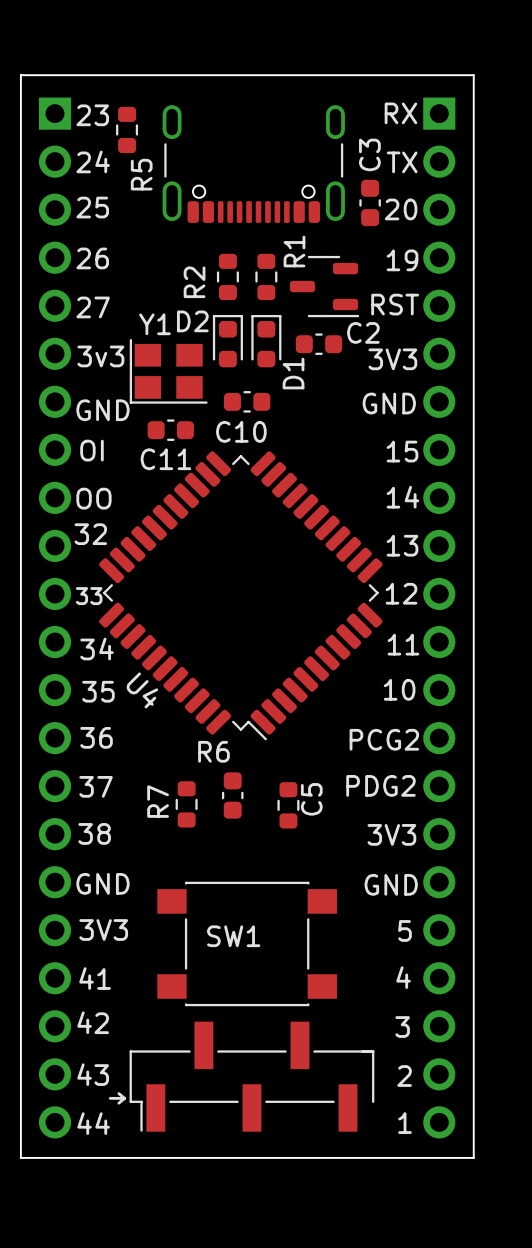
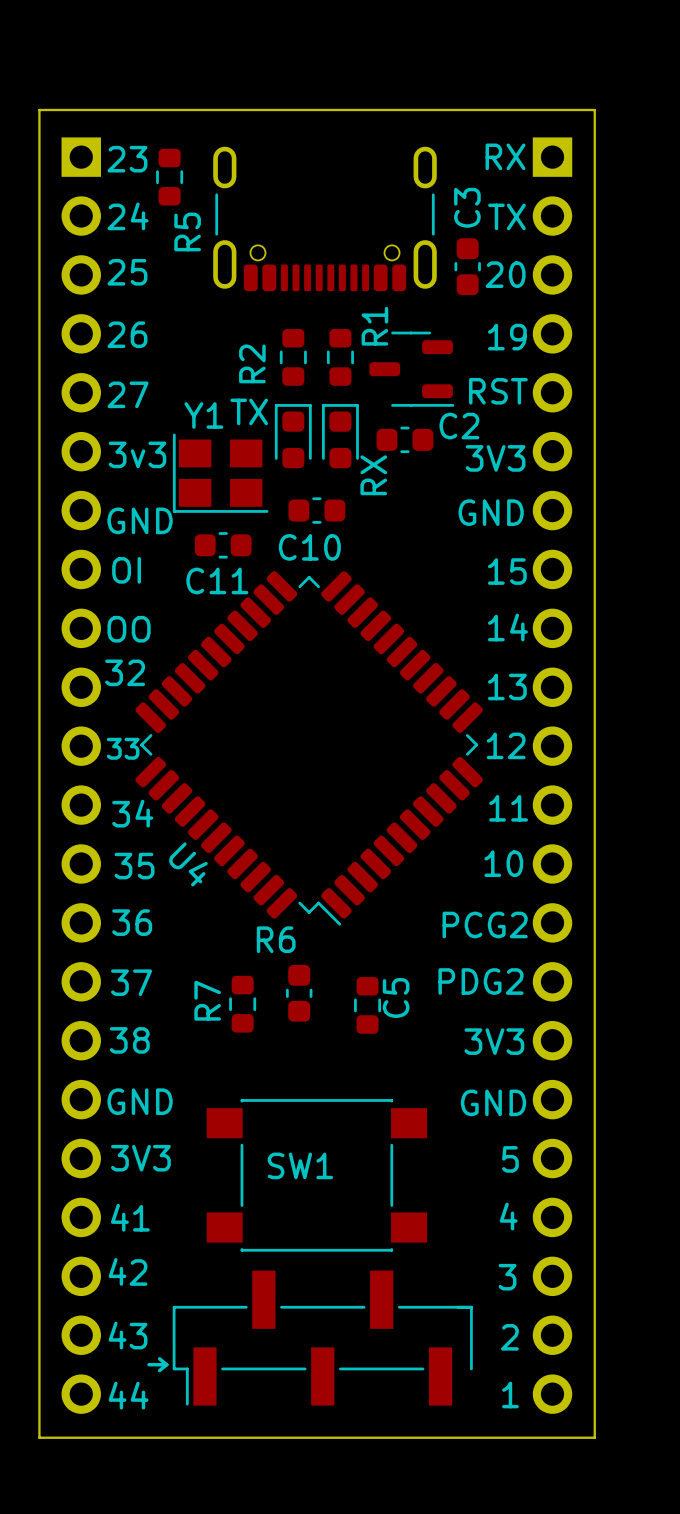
D2 name: D2 (192, 321) -> TX (249, 411)
D1 name: D1 (293, 373) -> RX (373, 475)

